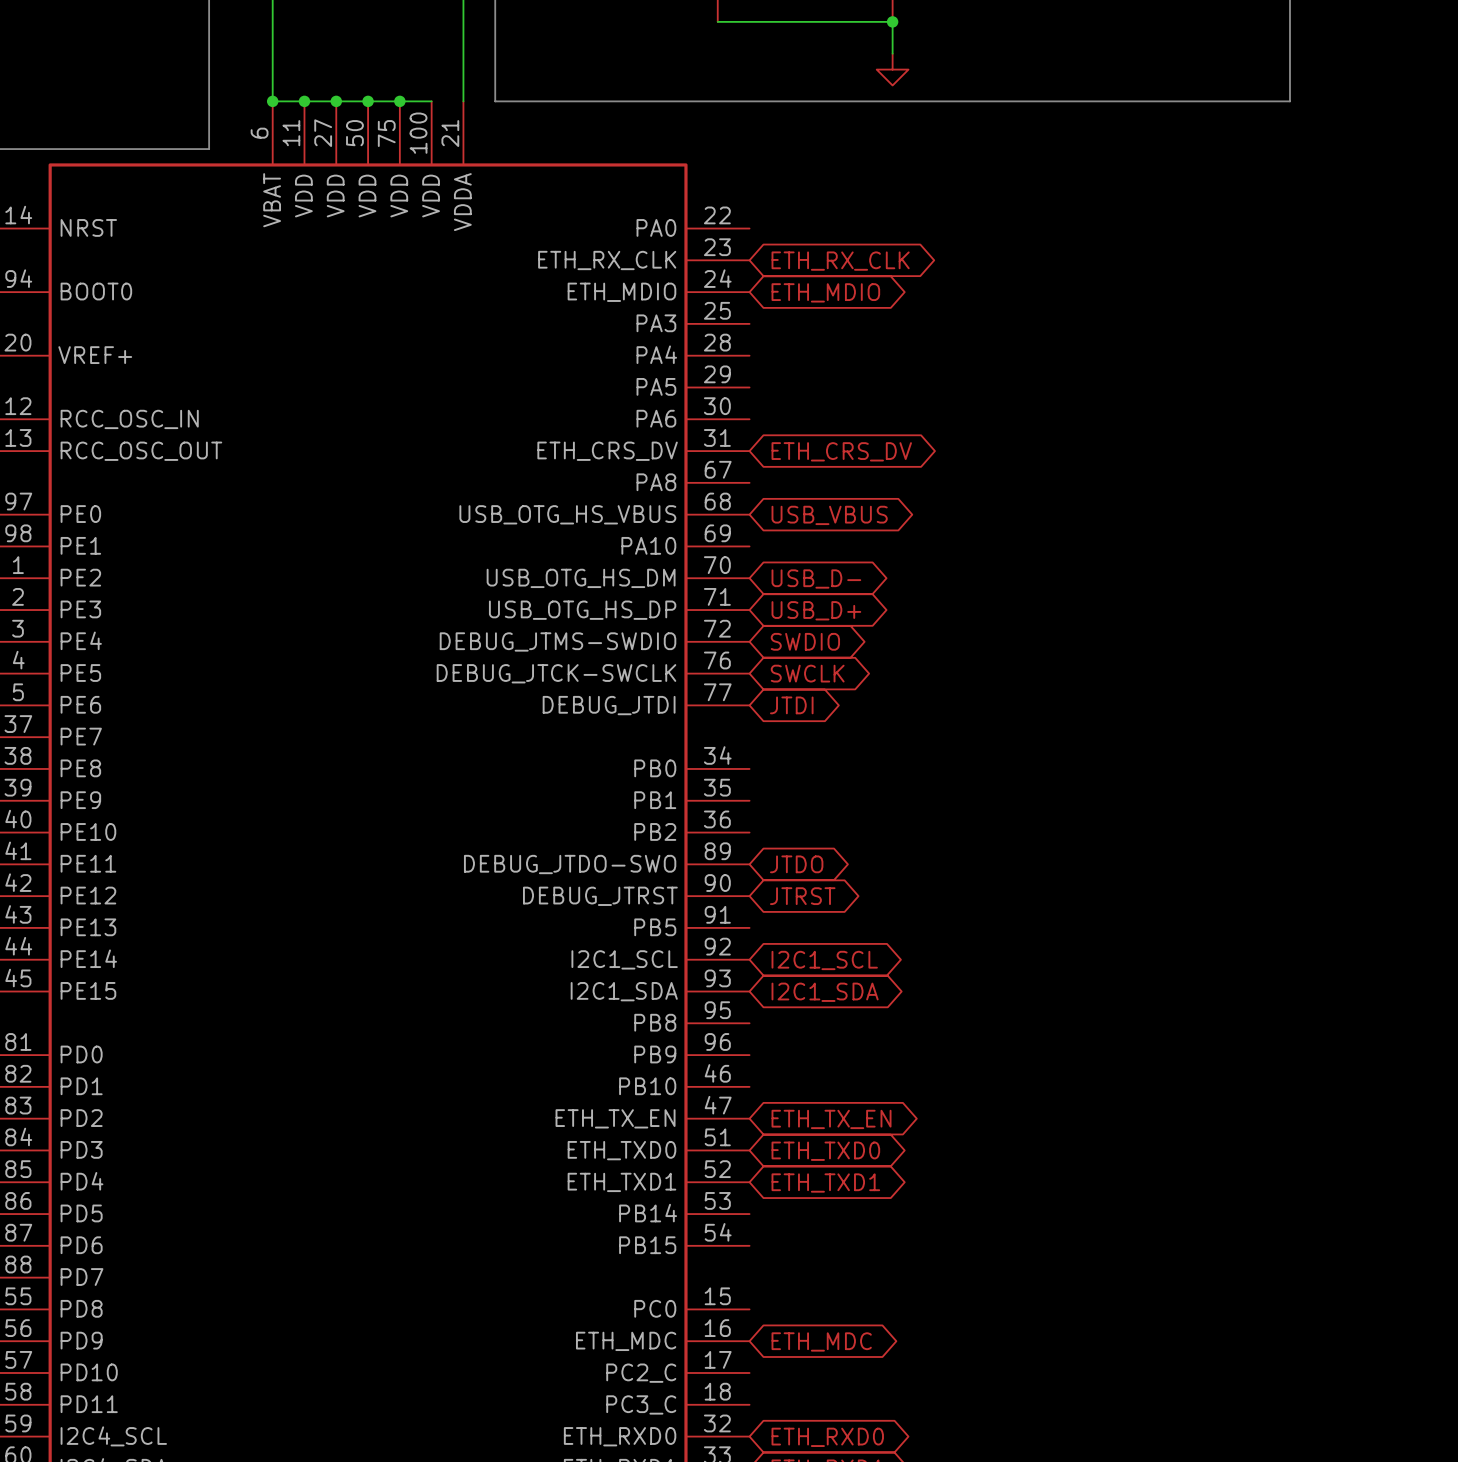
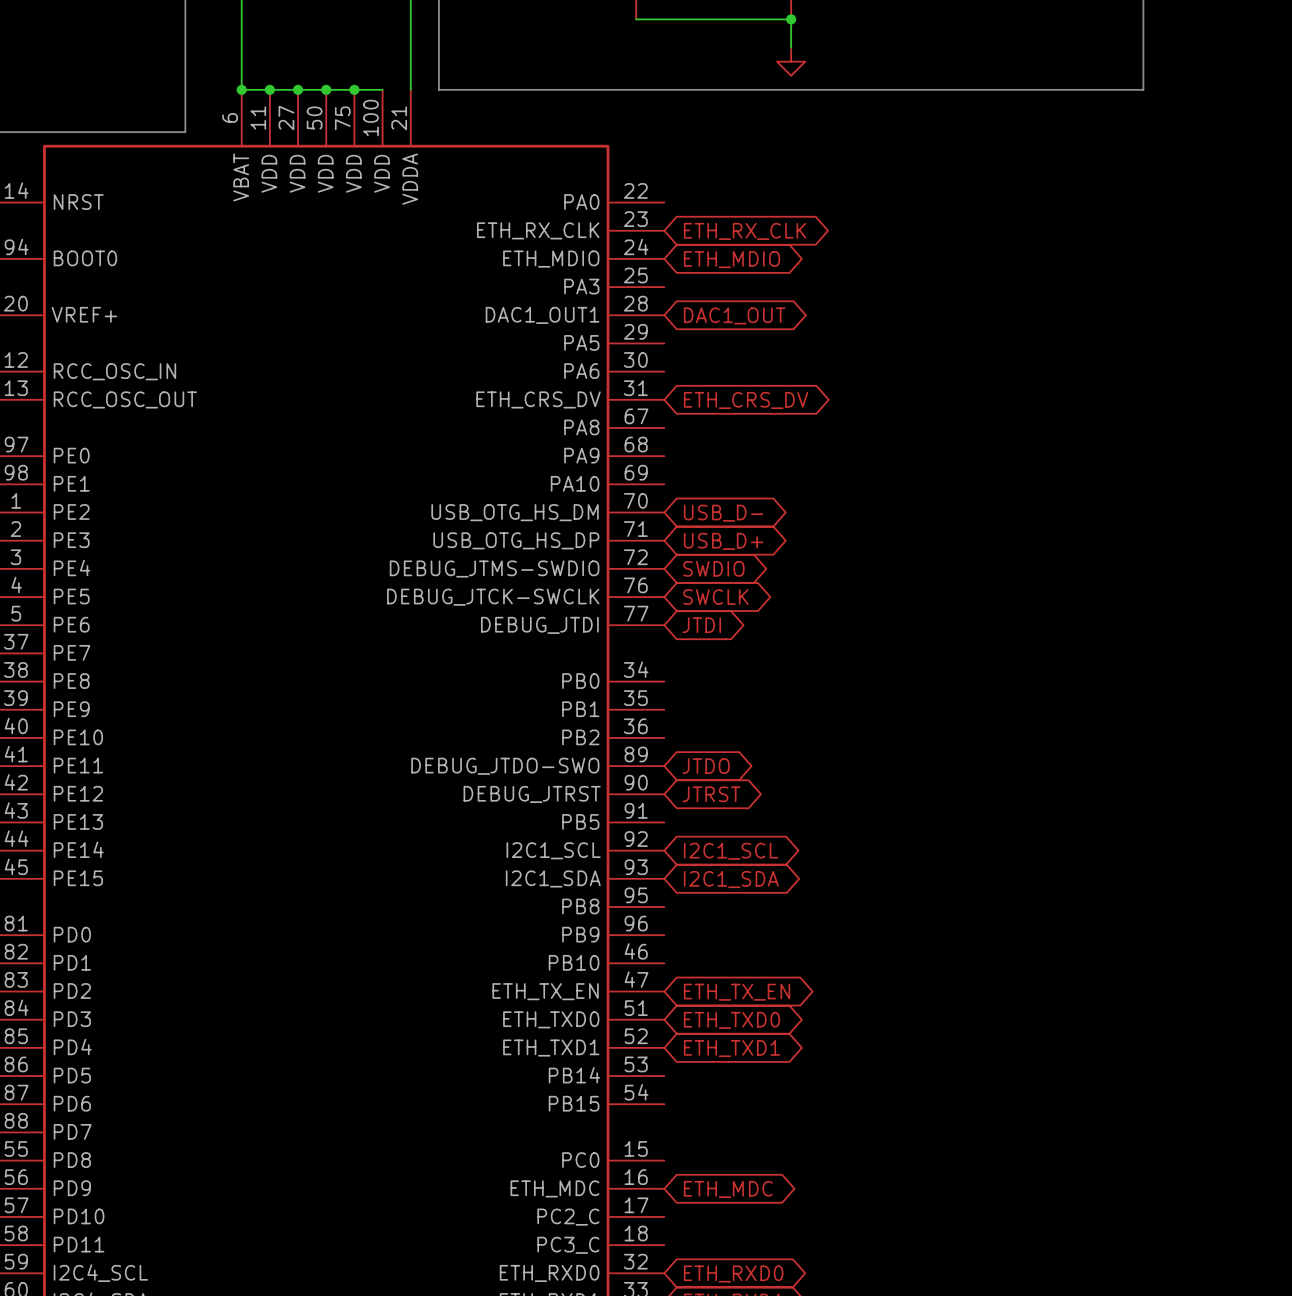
part pin name: PA4 (656, 354) -> DAC1_OUT1 (542, 315)
global label: none -> DAC1_OUT (734, 315)
part pin name: USB_OTG_HS_VBUS (567, 514) -> PA9 (581, 455)
global label: USB_VBUS (829, 515) -> none

